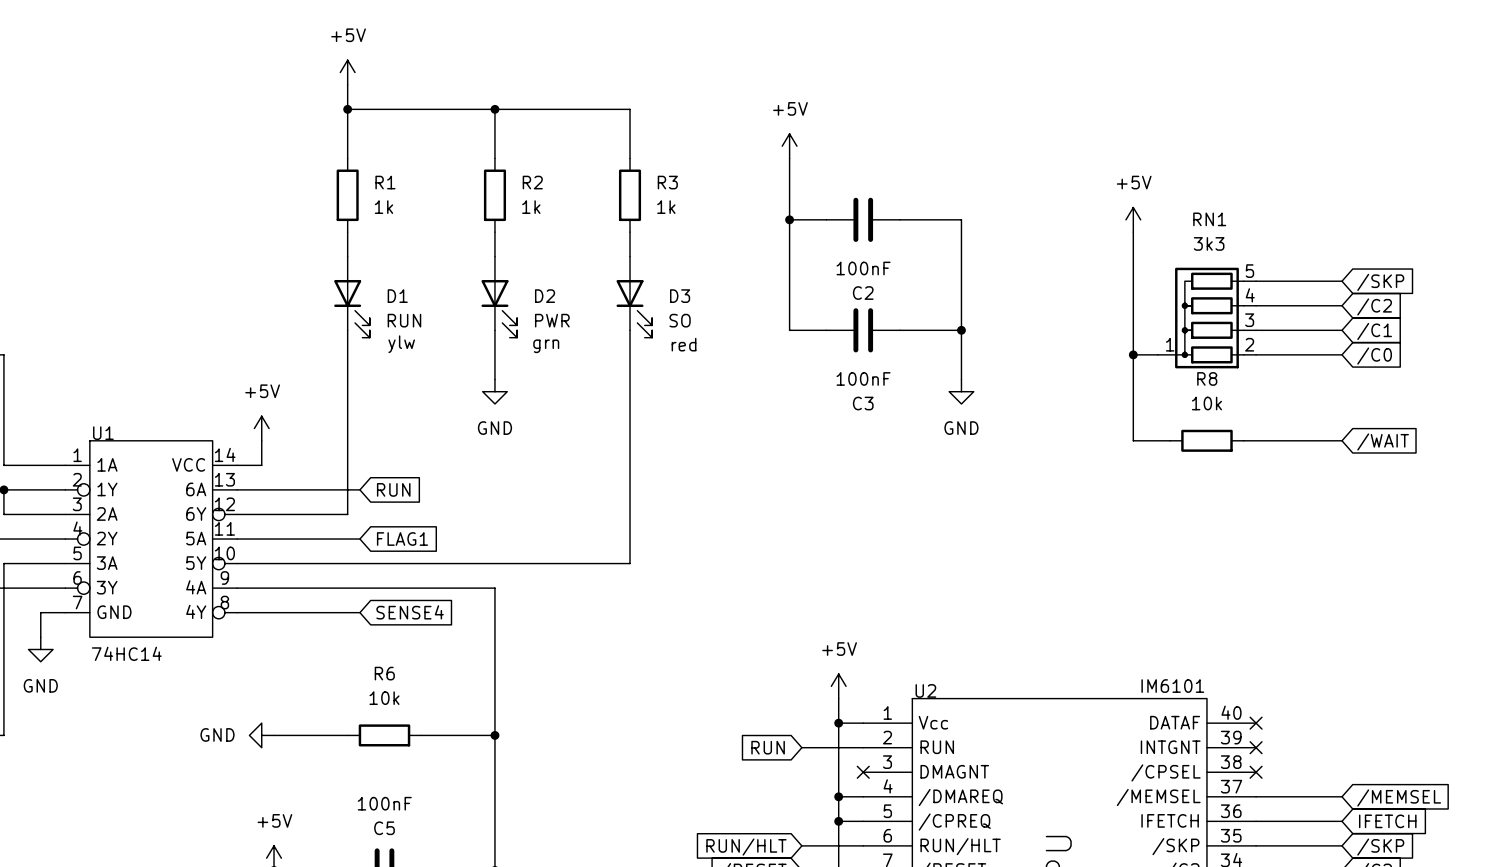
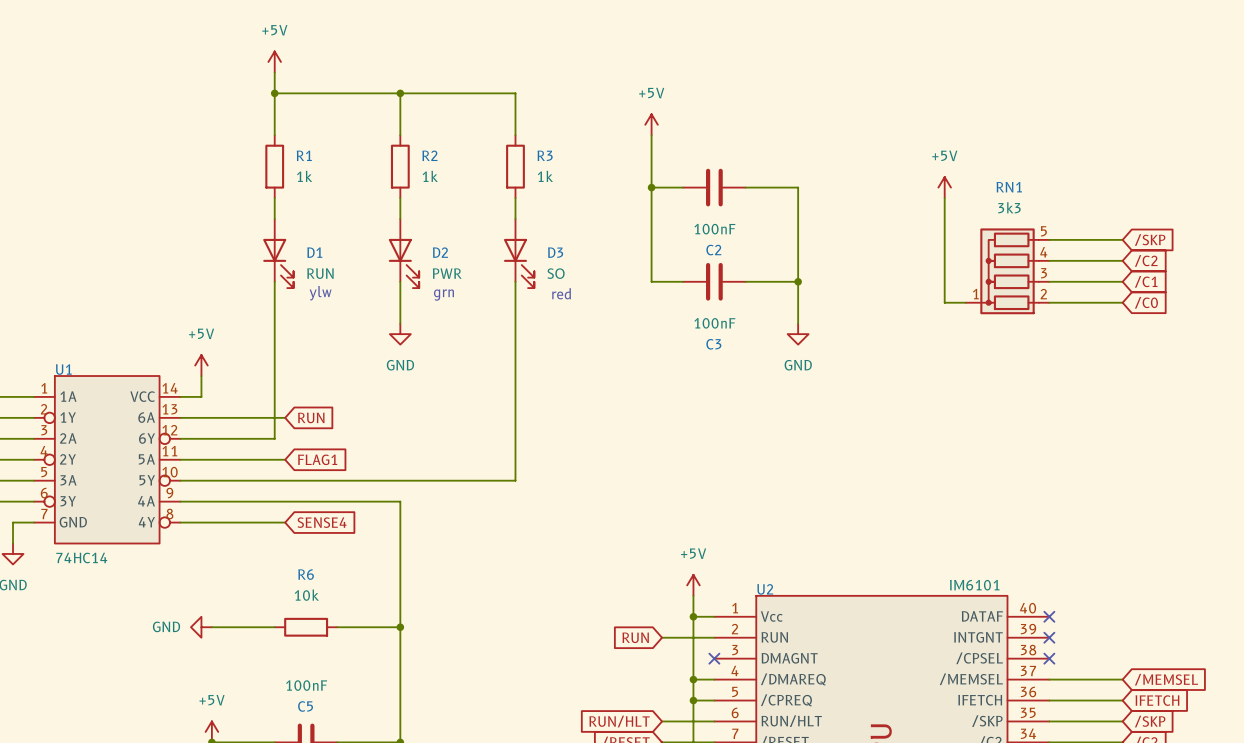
wire: (1133, 354) (1133, 440) (1170, 440) -> none
junction: (1133, 354) -> none
R8: 10k (1206, 440) -> none
wire: (1243, 440) (1342, 440) -> none
global label: /WAIT (1383, 441) -> none

